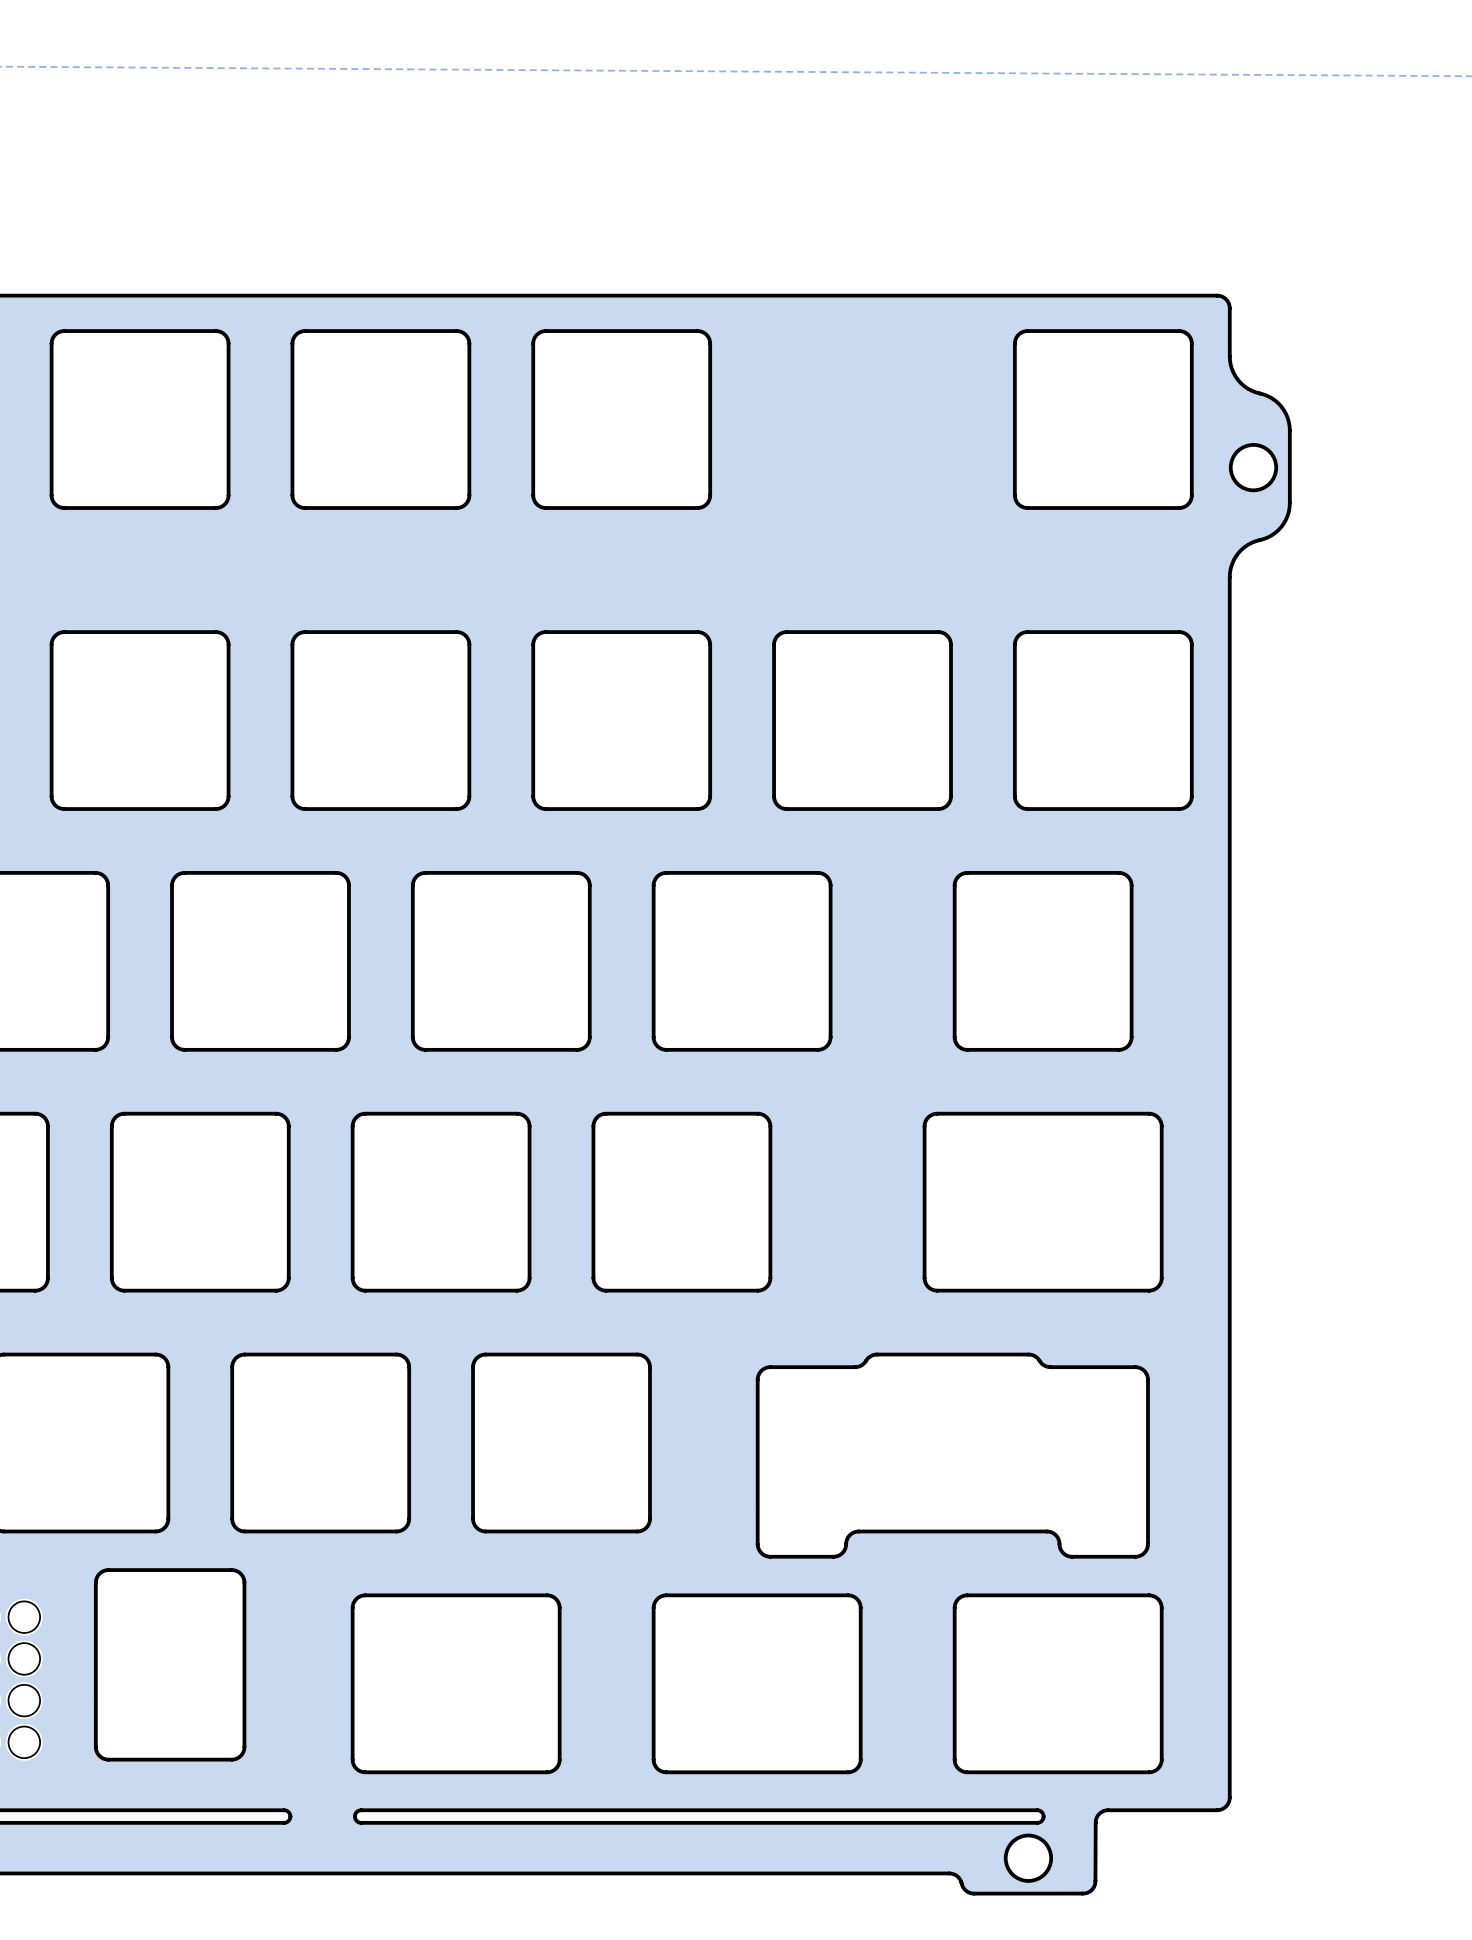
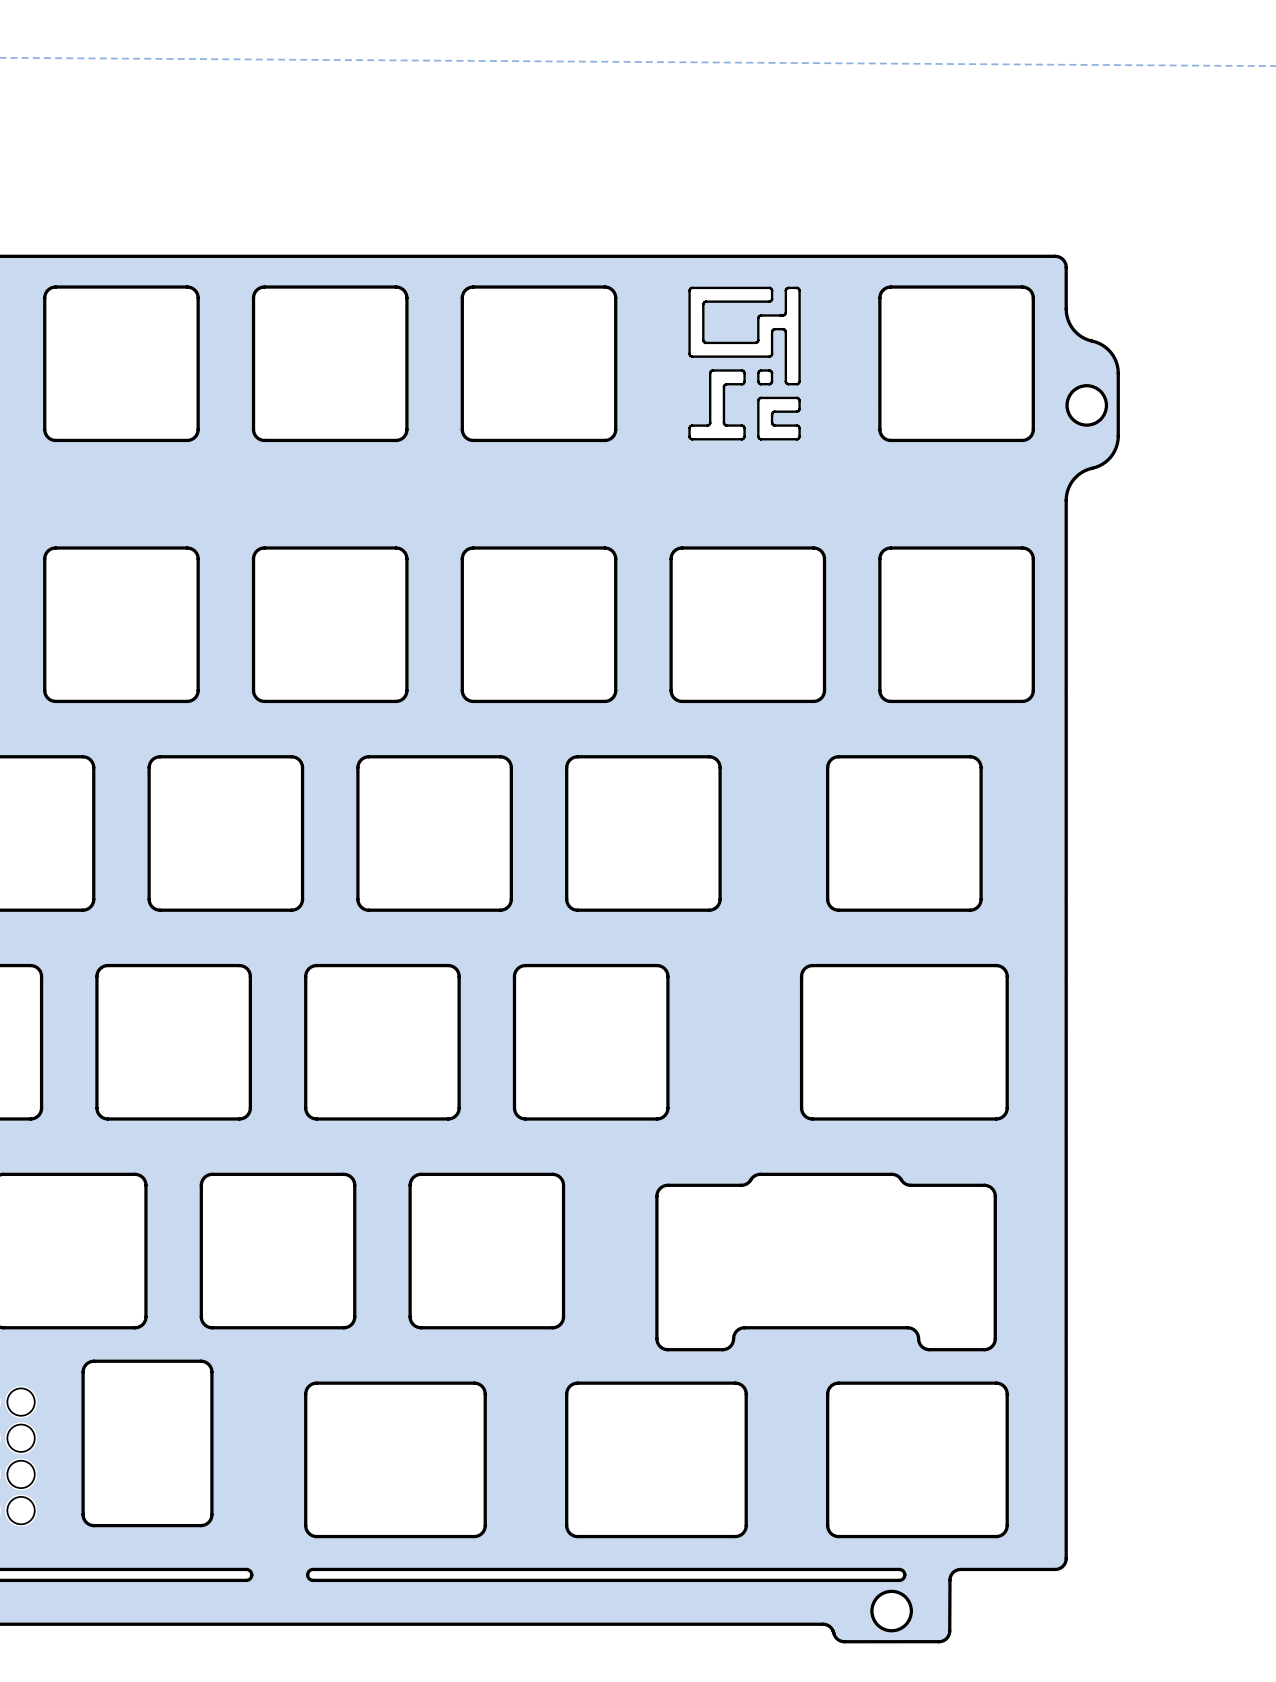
board edge: none -> (780, 315) (785, 313) (786, 288) (798, 288) (799, 381) (797, 384) (788, 384) (785, 381) (785, 331) (783, 329) (774, 329) (772, 331) (772, 354) (769, 356) (691, 356) (689, 354) (689, 290) (691, 287) (769, 287) (772, 290) (772, 299) (769, 301) (704, 302) (703, 340) (705, 342) (756, 342) (758, 340) (759, 316) (780, 315)
board edge: none -> (742, 370) (711, 371) (710, 423) (707, 425) (690, 426) (690, 438) (743, 438) (743, 426) (726, 425) (723, 423) (723, 386) (726, 384) (743, 383) (744, 372) (742, 370)
board edge: none -> (769, 370) (759, 371) (759, 383) (771, 383) (772, 372) (769, 370)
board edge: none -> (797, 397) (799, 400) (798, 410) (774, 411) (772, 414) (772, 423) (774, 425) (798, 426) (798, 438) (759, 438) (759, 398) (797, 397)

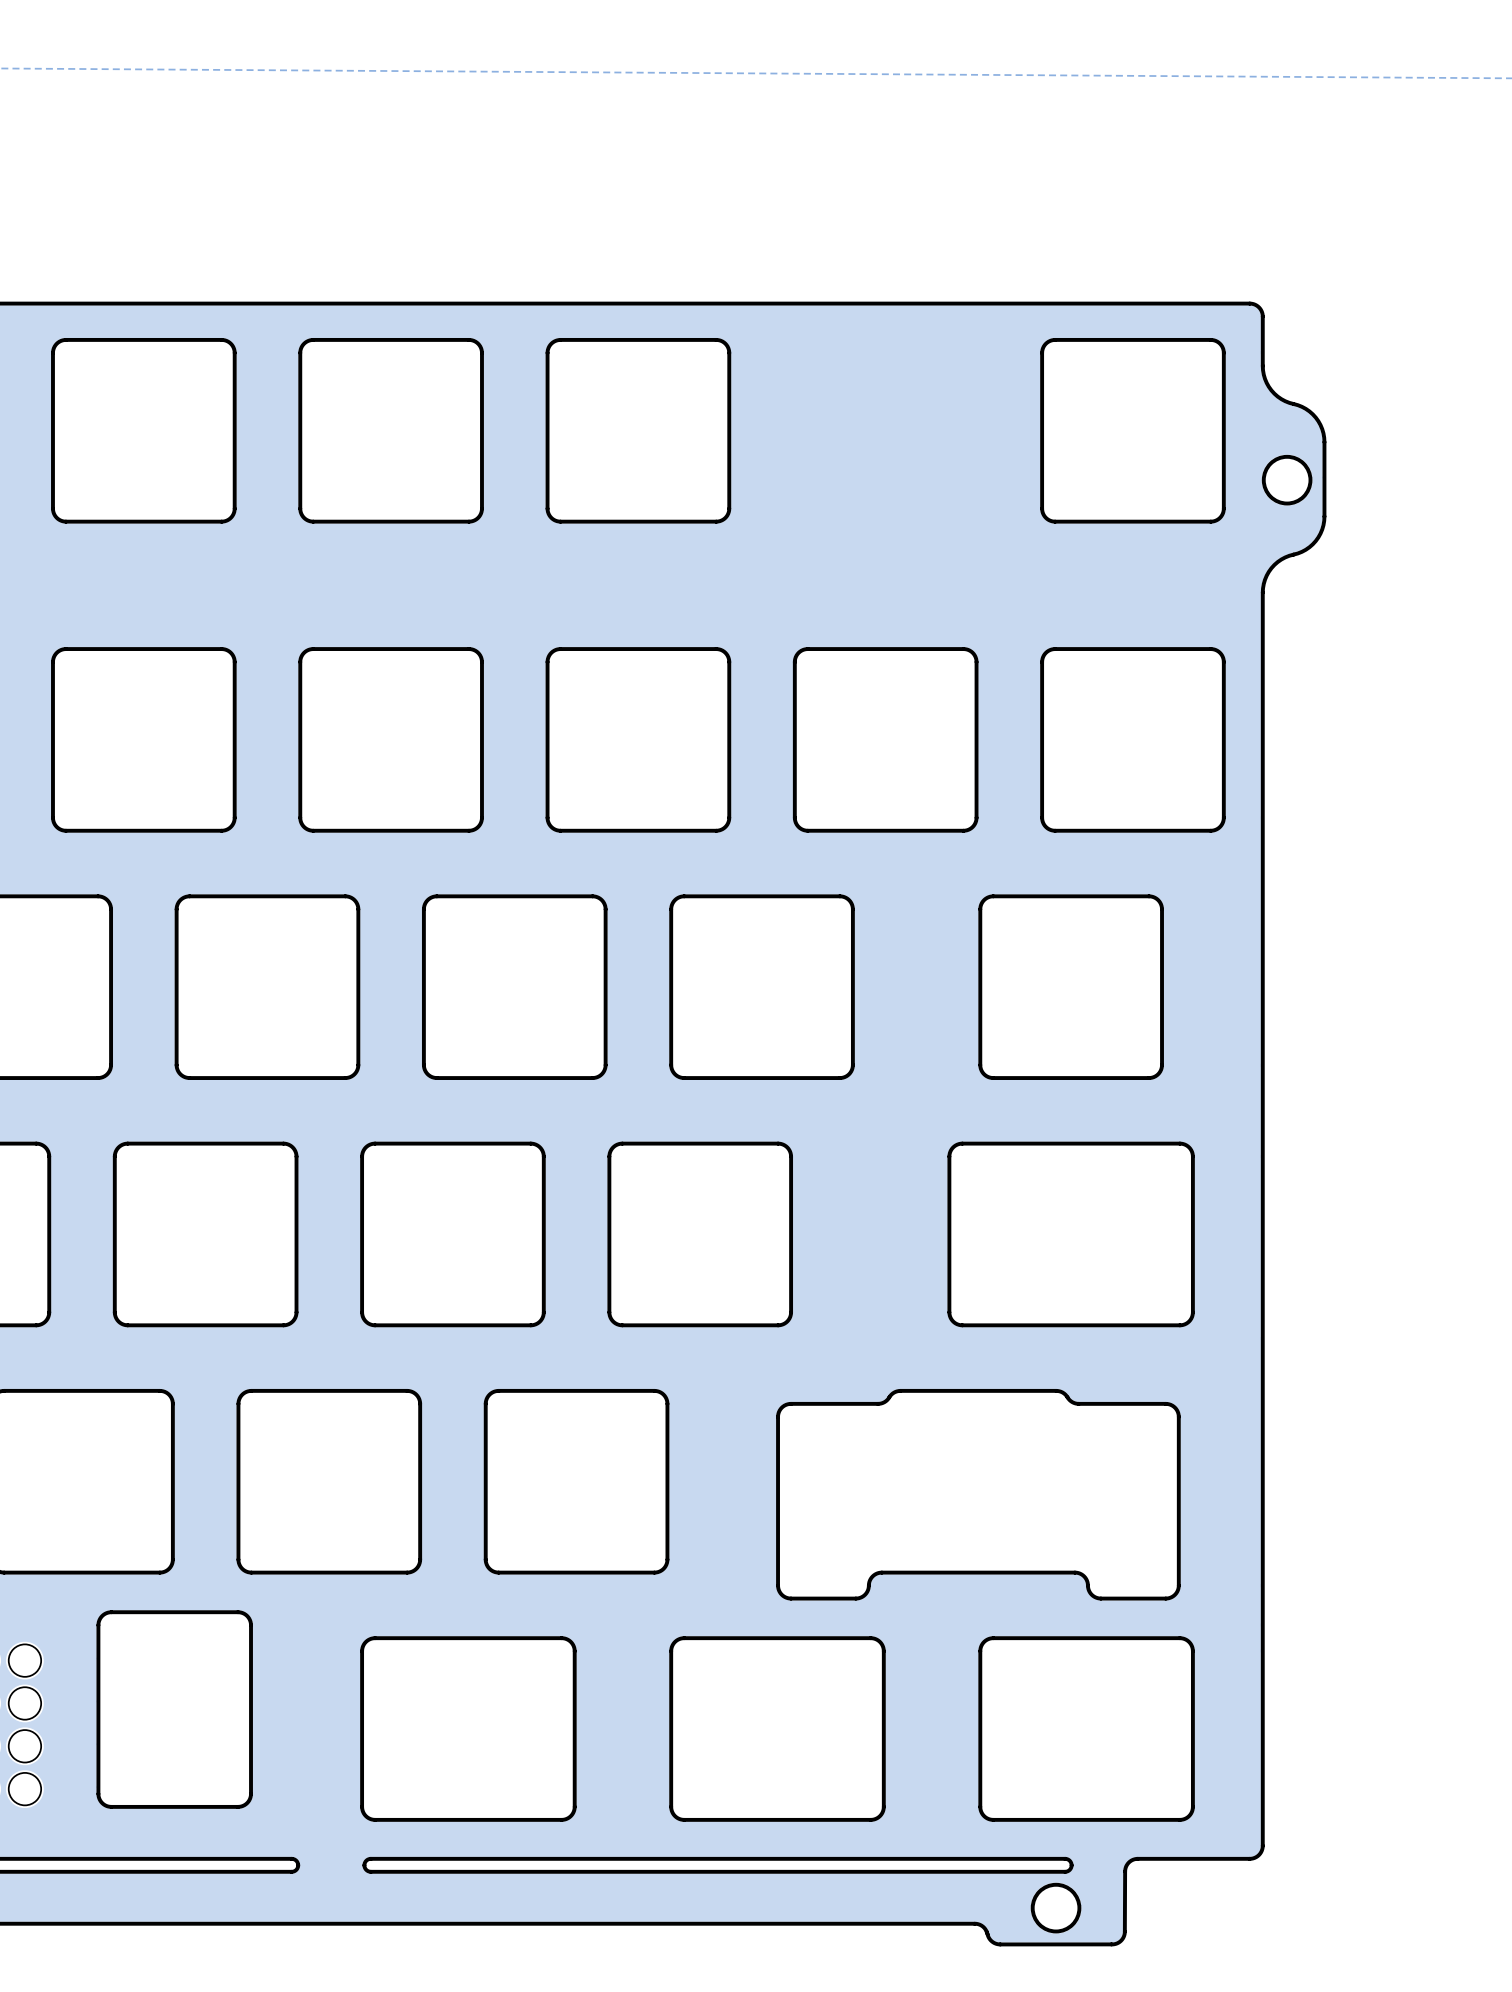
board edge: (780, 315) (785, 313) (786, 288) (798, 288) (799, 381) (797, 384) (788, 384) (785, 381) (785, 331) (783, 329) (774, 329) (772, 331) (772, 354) (769, 356) (691, 356) (689, 354) (689, 290) (691, 287) (769, 287) (772, 290) (772, 299) (769, 301) (704, 302) (703, 340) (705, 342) (756, 342) (758, 340) (759, 316) (780, 315) -> none
board edge: (742, 370) (711, 371) (710, 423) (707, 425) (690, 426) (690, 438) (743, 438) (743, 426) (726, 425) (723, 423) (723, 386) (726, 384) (743, 383) (744, 372) (742, 370) -> none
board edge: (769, 370) (759, 371) (759, 383) (771, 383) (772, 372) (769, 370) -> none
board edge: (797, 397) (799, 400) (798, 410) (774, 411) (772, 414) (772, 423) (774, 425) (798, 426) (798, 438) (759, 438) (759, 398) (797, 397) -> none

